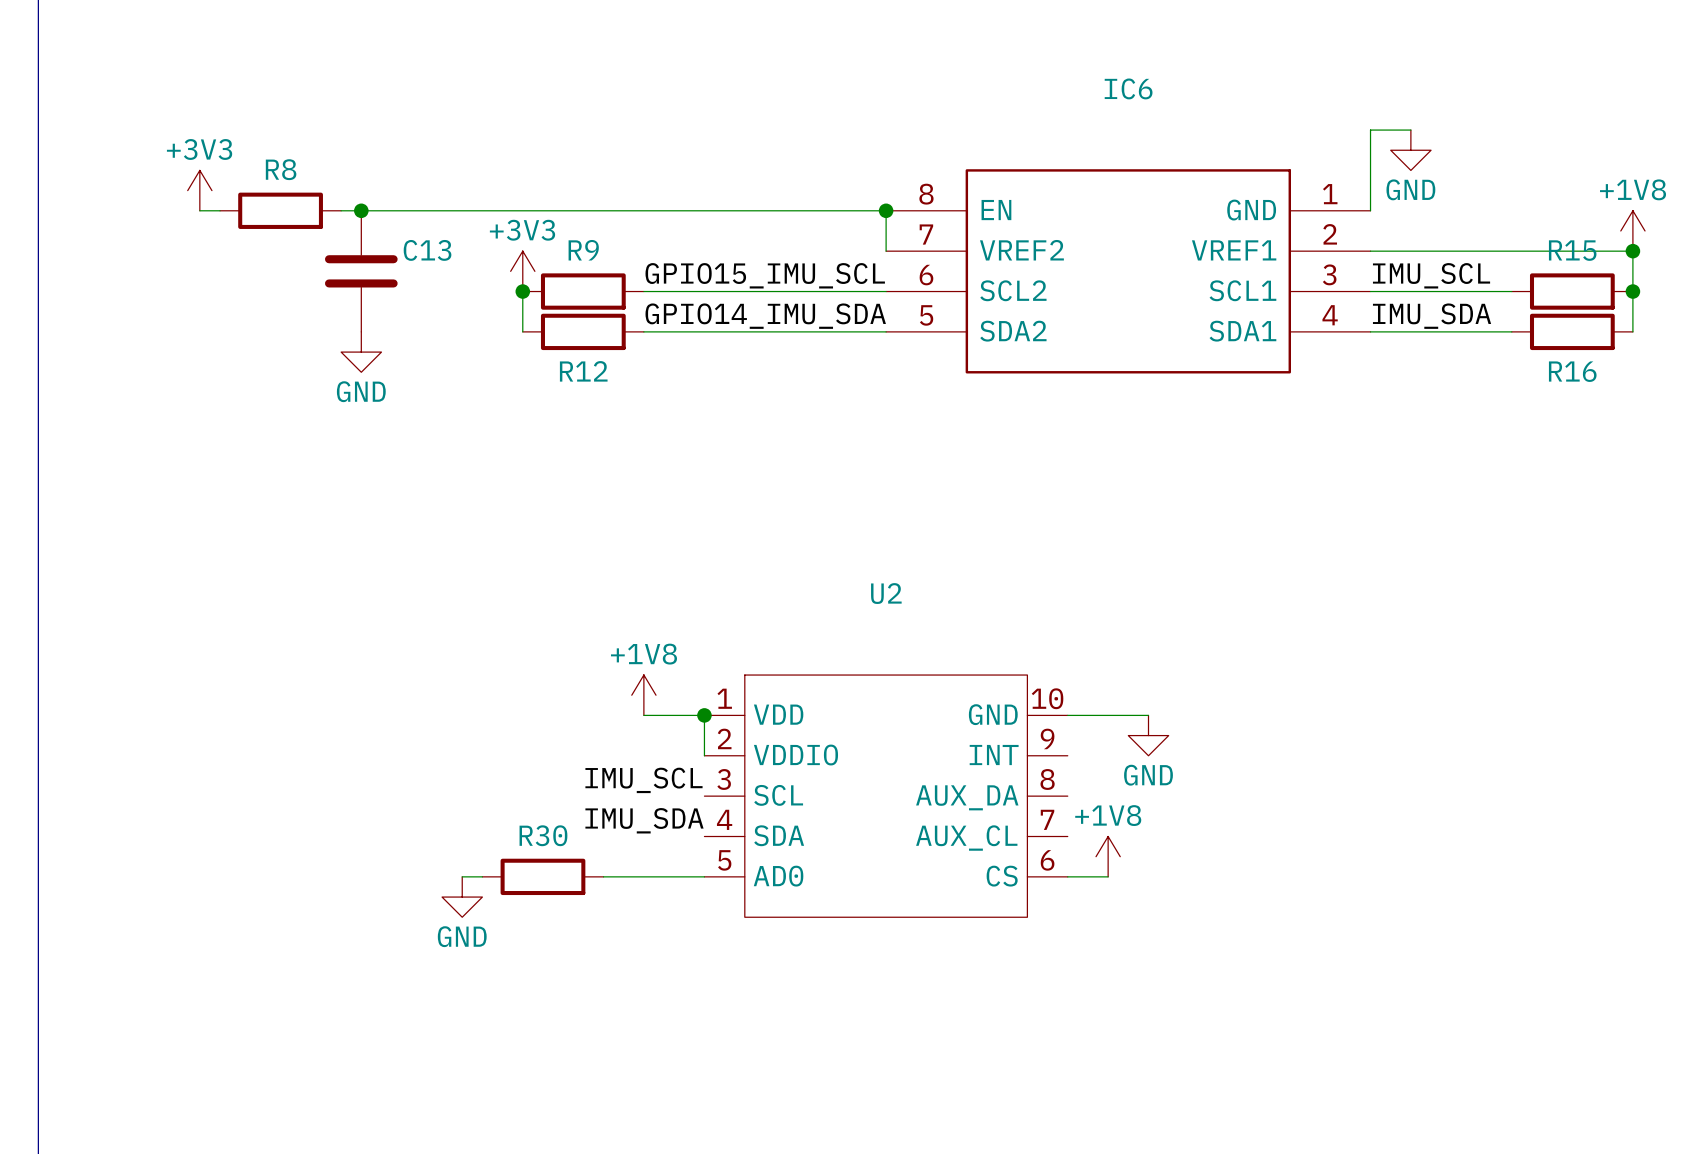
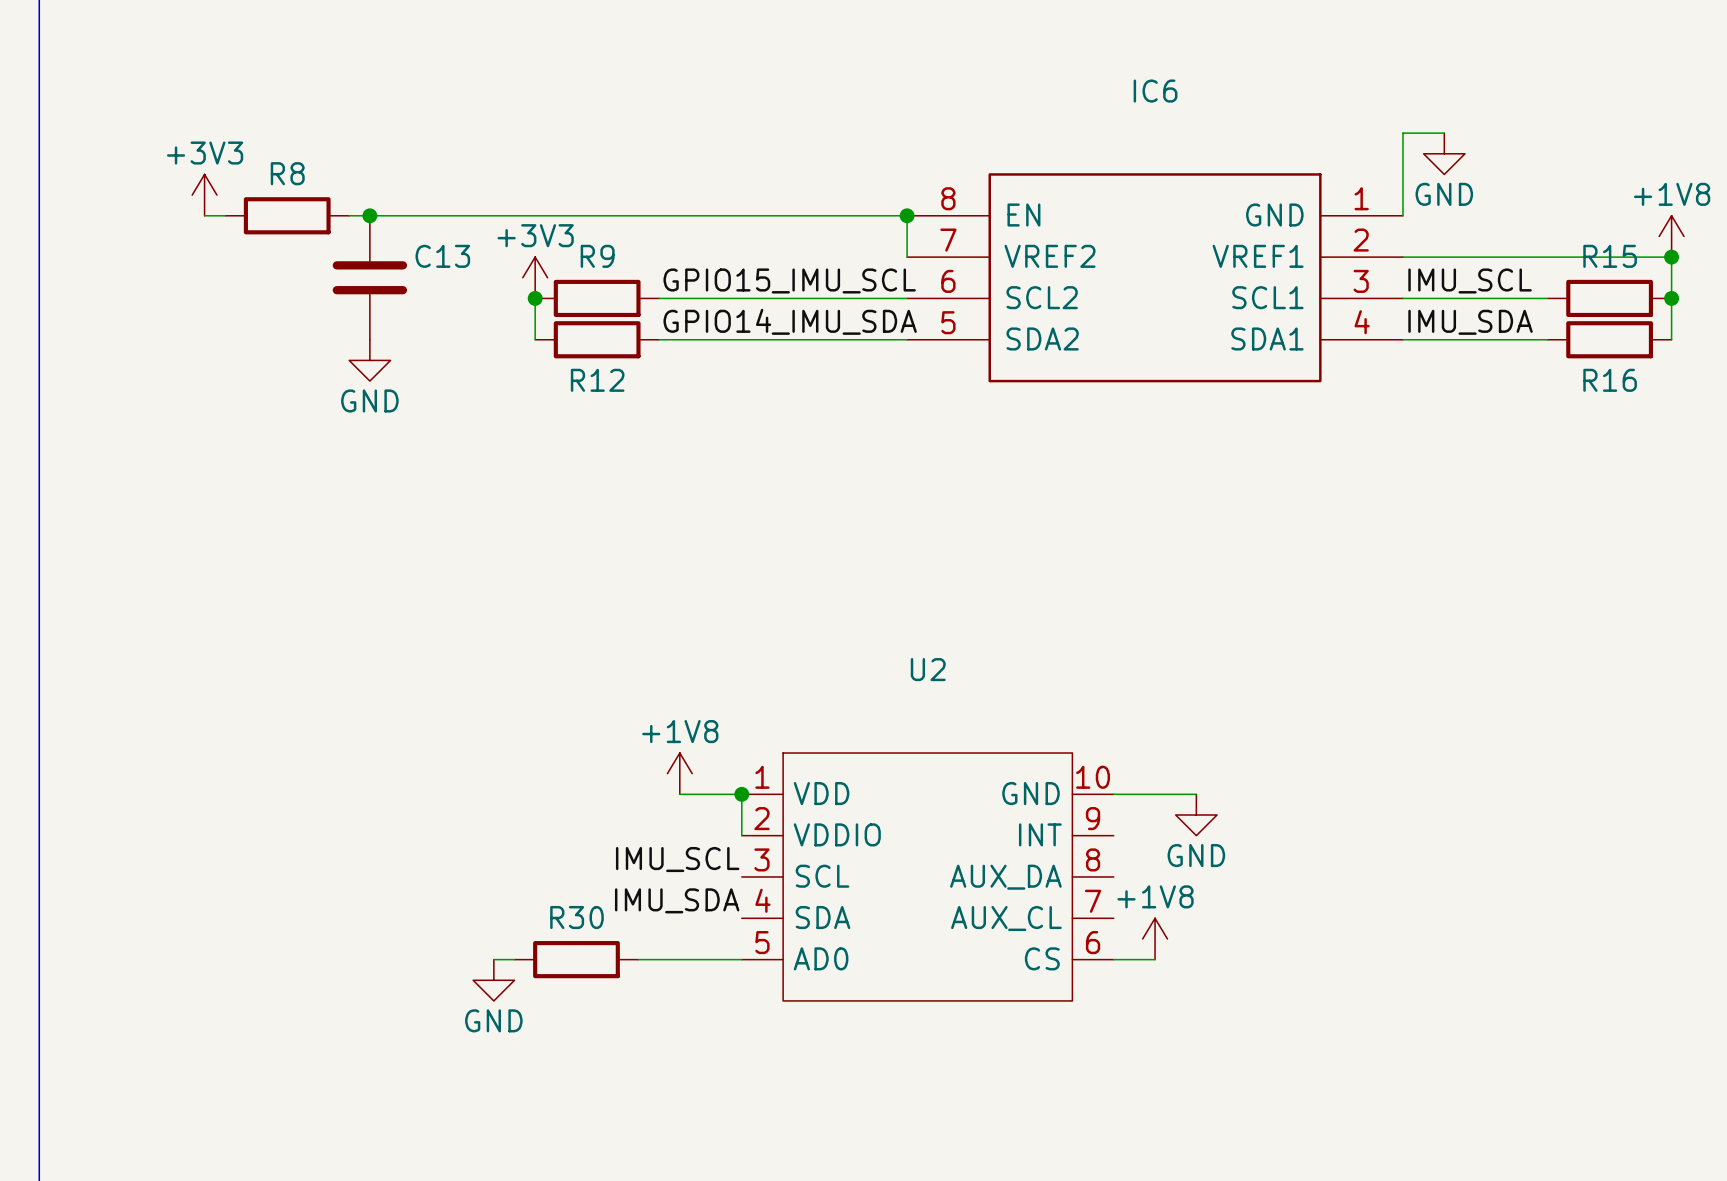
power symbol position: +1V8 (643, 695) -> +1V8 (679, 773)
wire: (643, 715) (704, 715) (704, 755) -> (679, 794) (741, 794) (741, 835)
junction position: (704, 715) -> (741, 794)
wire: (1067, 715) (1148, 715) -> (1113, 794) (1196, 794)
power symbol position: GND (1148, 735) -> GND (1196, 814)
label position: IMU_SCL (643, 780) -> IMU_SCL (677, 859)
U2 position: (886, 796) -> (927, 876)
label position: IMU_SDA (644, 820) -> IMU_SDA (677, 900)
power symbol position: +1V8 (1108, 856) -> +1V8 (1155, 938)
wire: (462, 876) (482, 876) -> (493, 959) (514, 959)
R30 position: (542, 876) -> (576, 959)
wire: (603, 876) (704, 876) -> (638, 959) (741, 959)
wire: (1067, 876) (1108, 876) -> (1113, 959) (1155, 959)
power symbol position: GND (462, 897) -> GND (493, 980)

